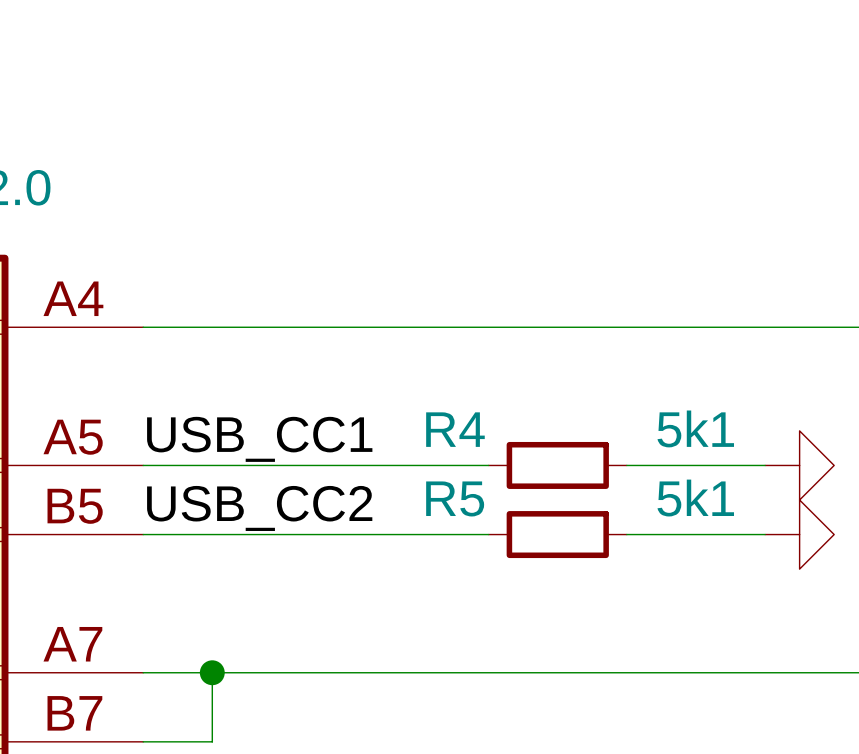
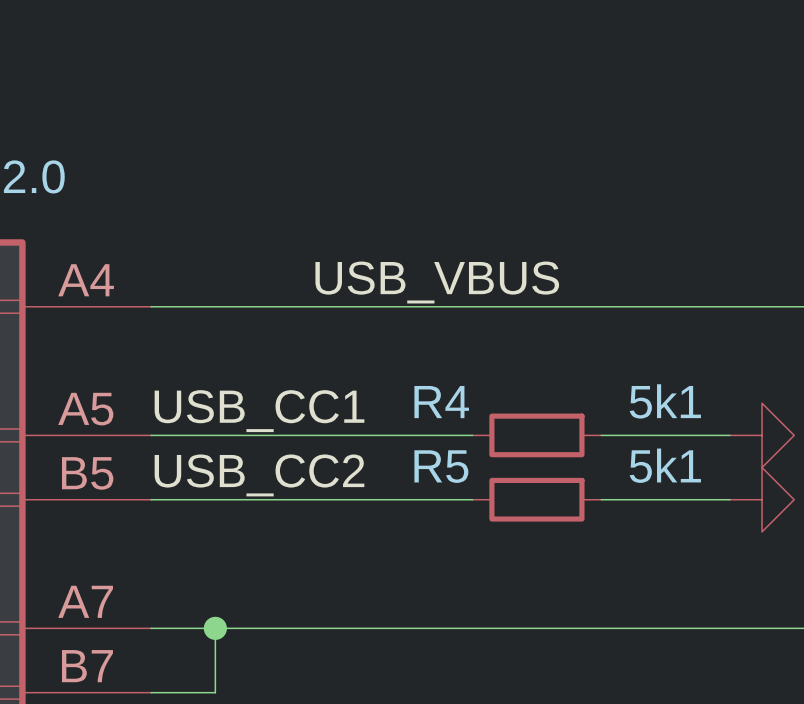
label: none -> USB_VBUS (437, 282)

